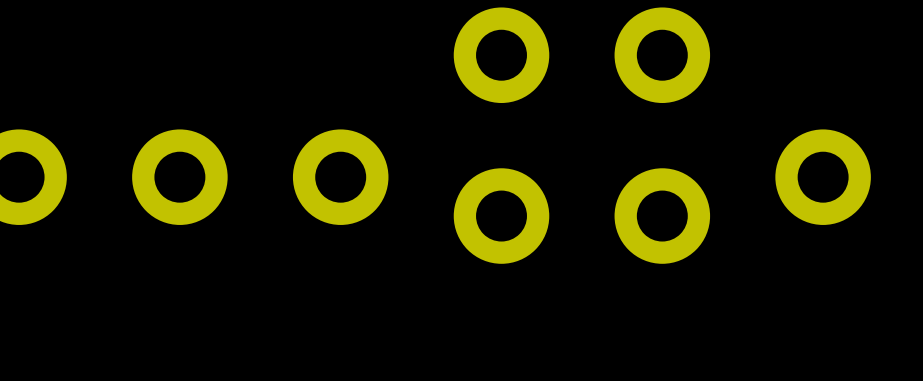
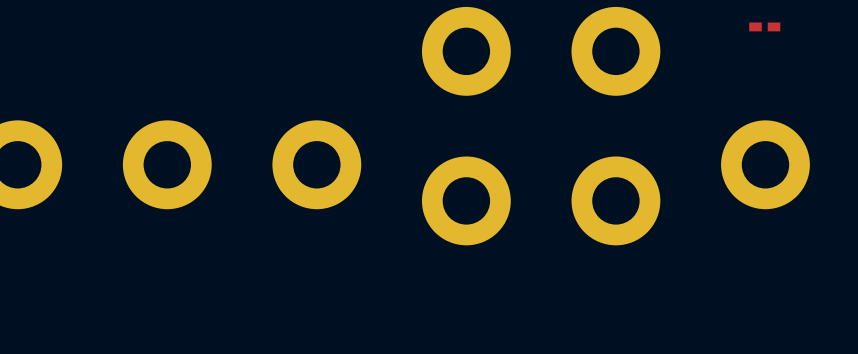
part: none -> (764, 26)

